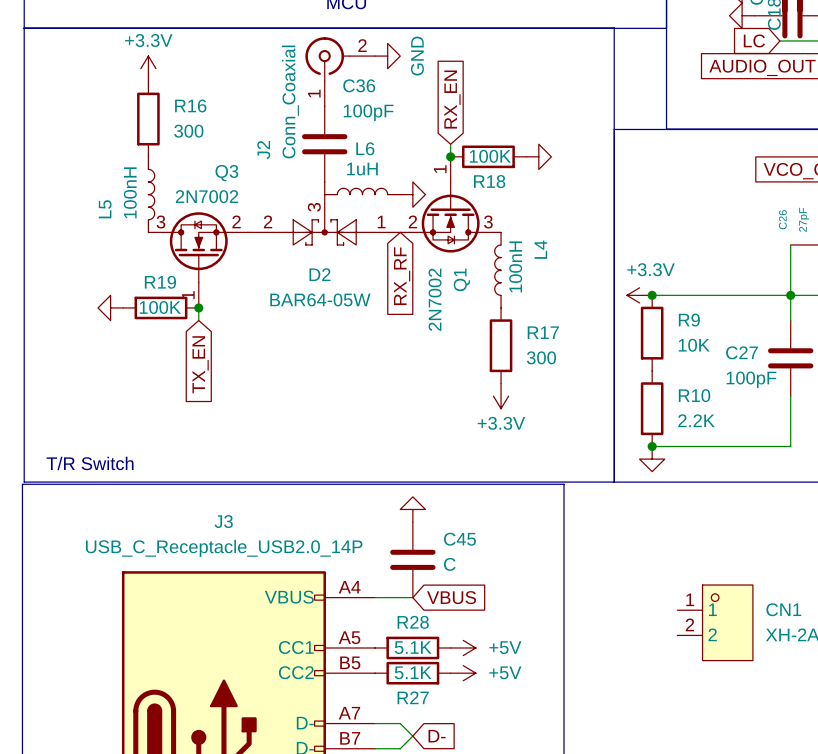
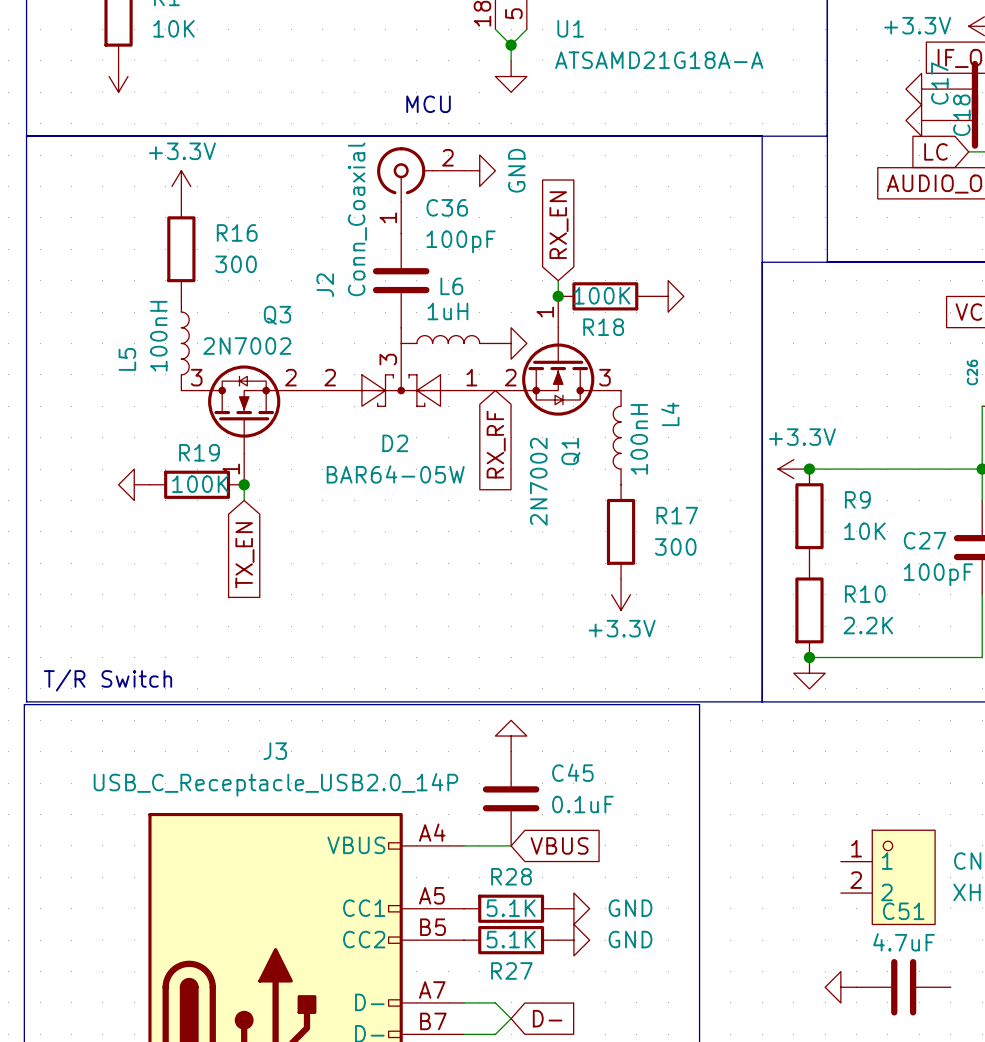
C45 value: C (449, 564) -> 0.1uF (582, 804)
power symbol: +5V (463, 647) -> GND (573, 908)
power symbol: +5V (463, 673) -> GND (573, 940)
power symbol: none -> (840, 987)
C51: none -> 4.7uF (903, 987)

